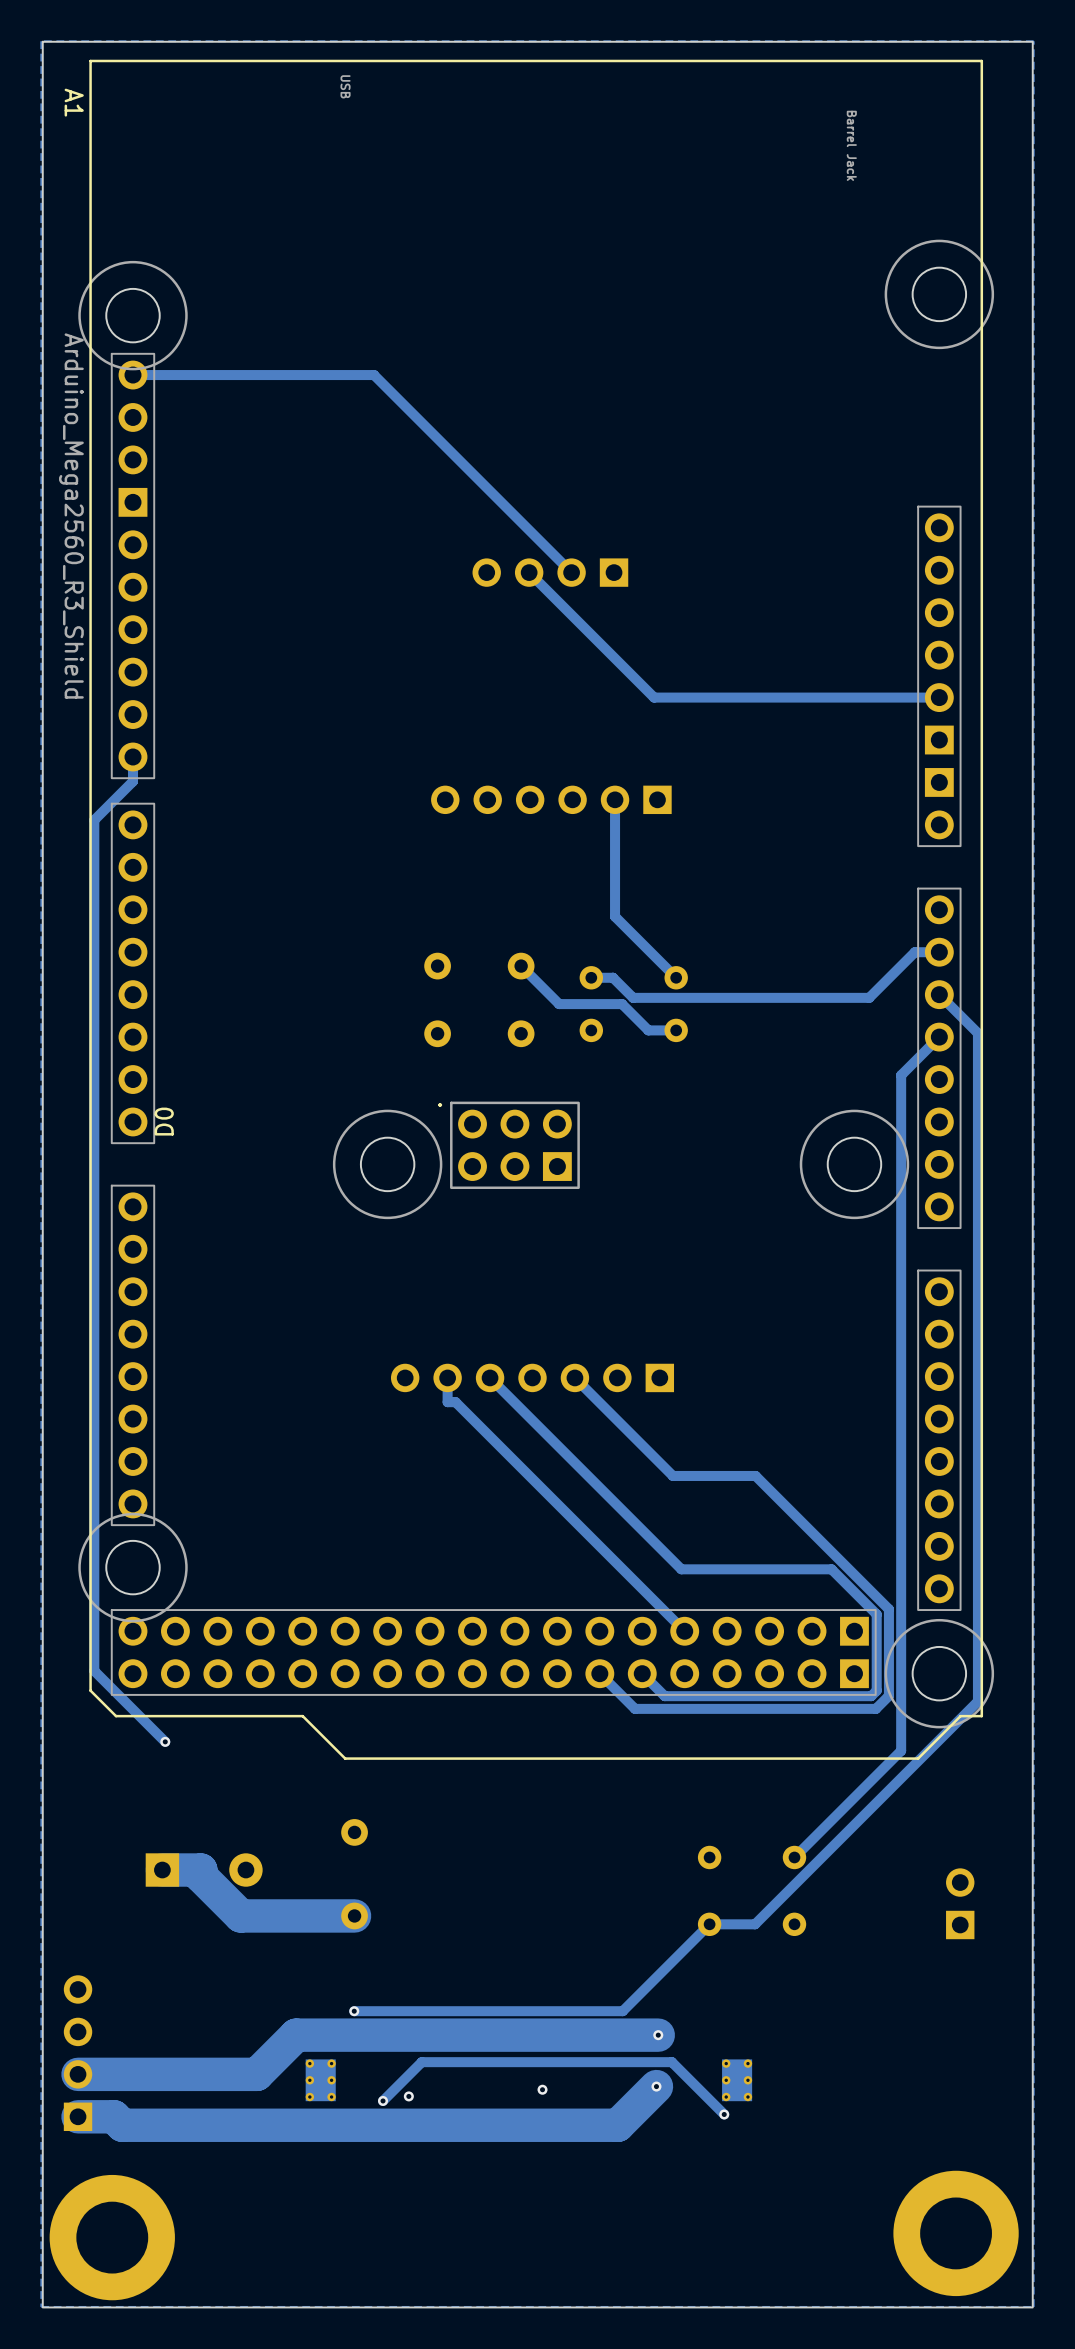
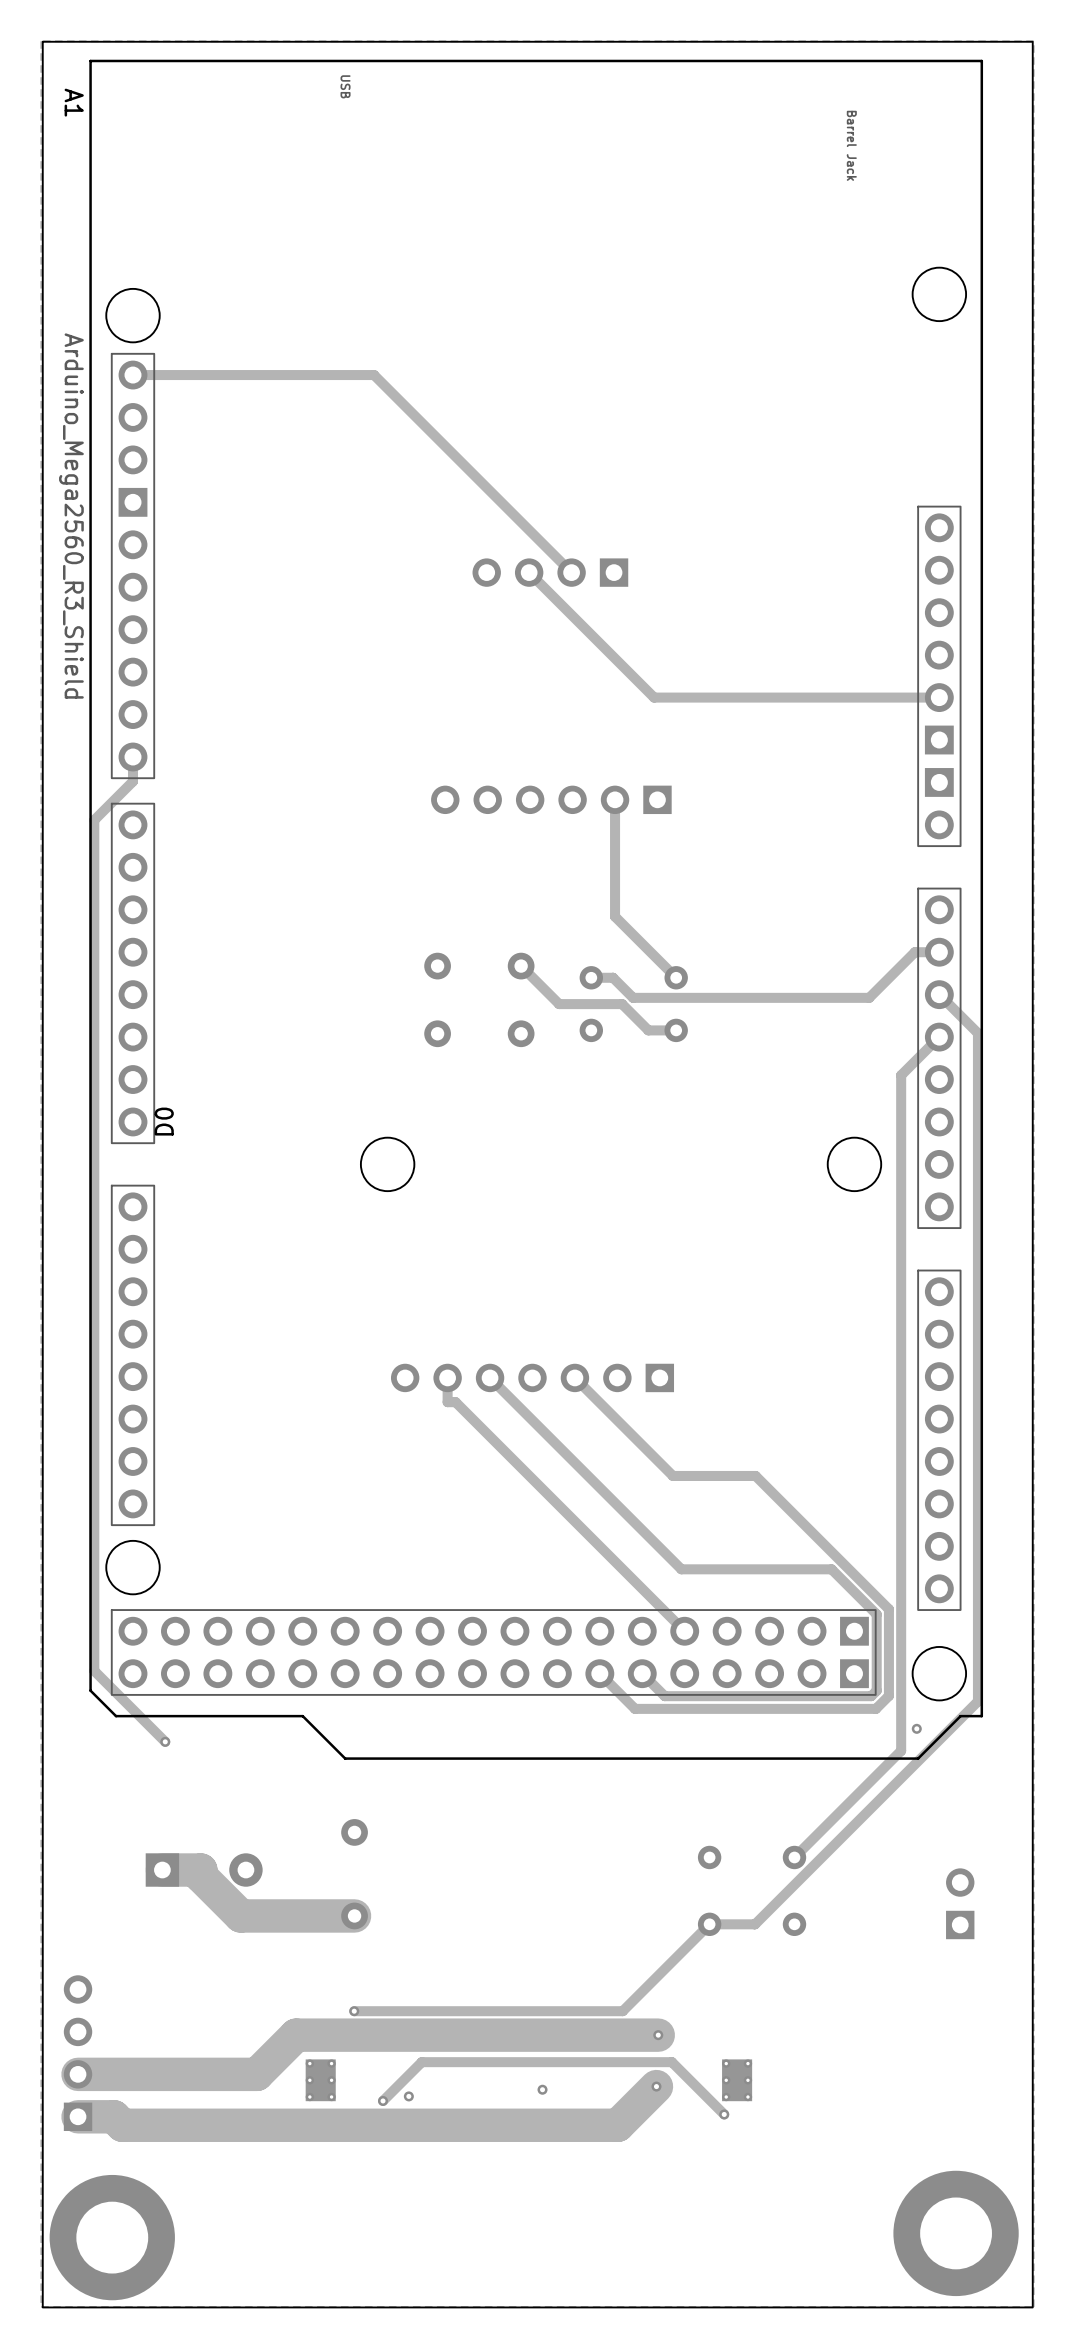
A1 footprint: [42, 41, 1034, 2308] -> [42, 41, 1034, 2308]
via: none -> (916, 1728)

